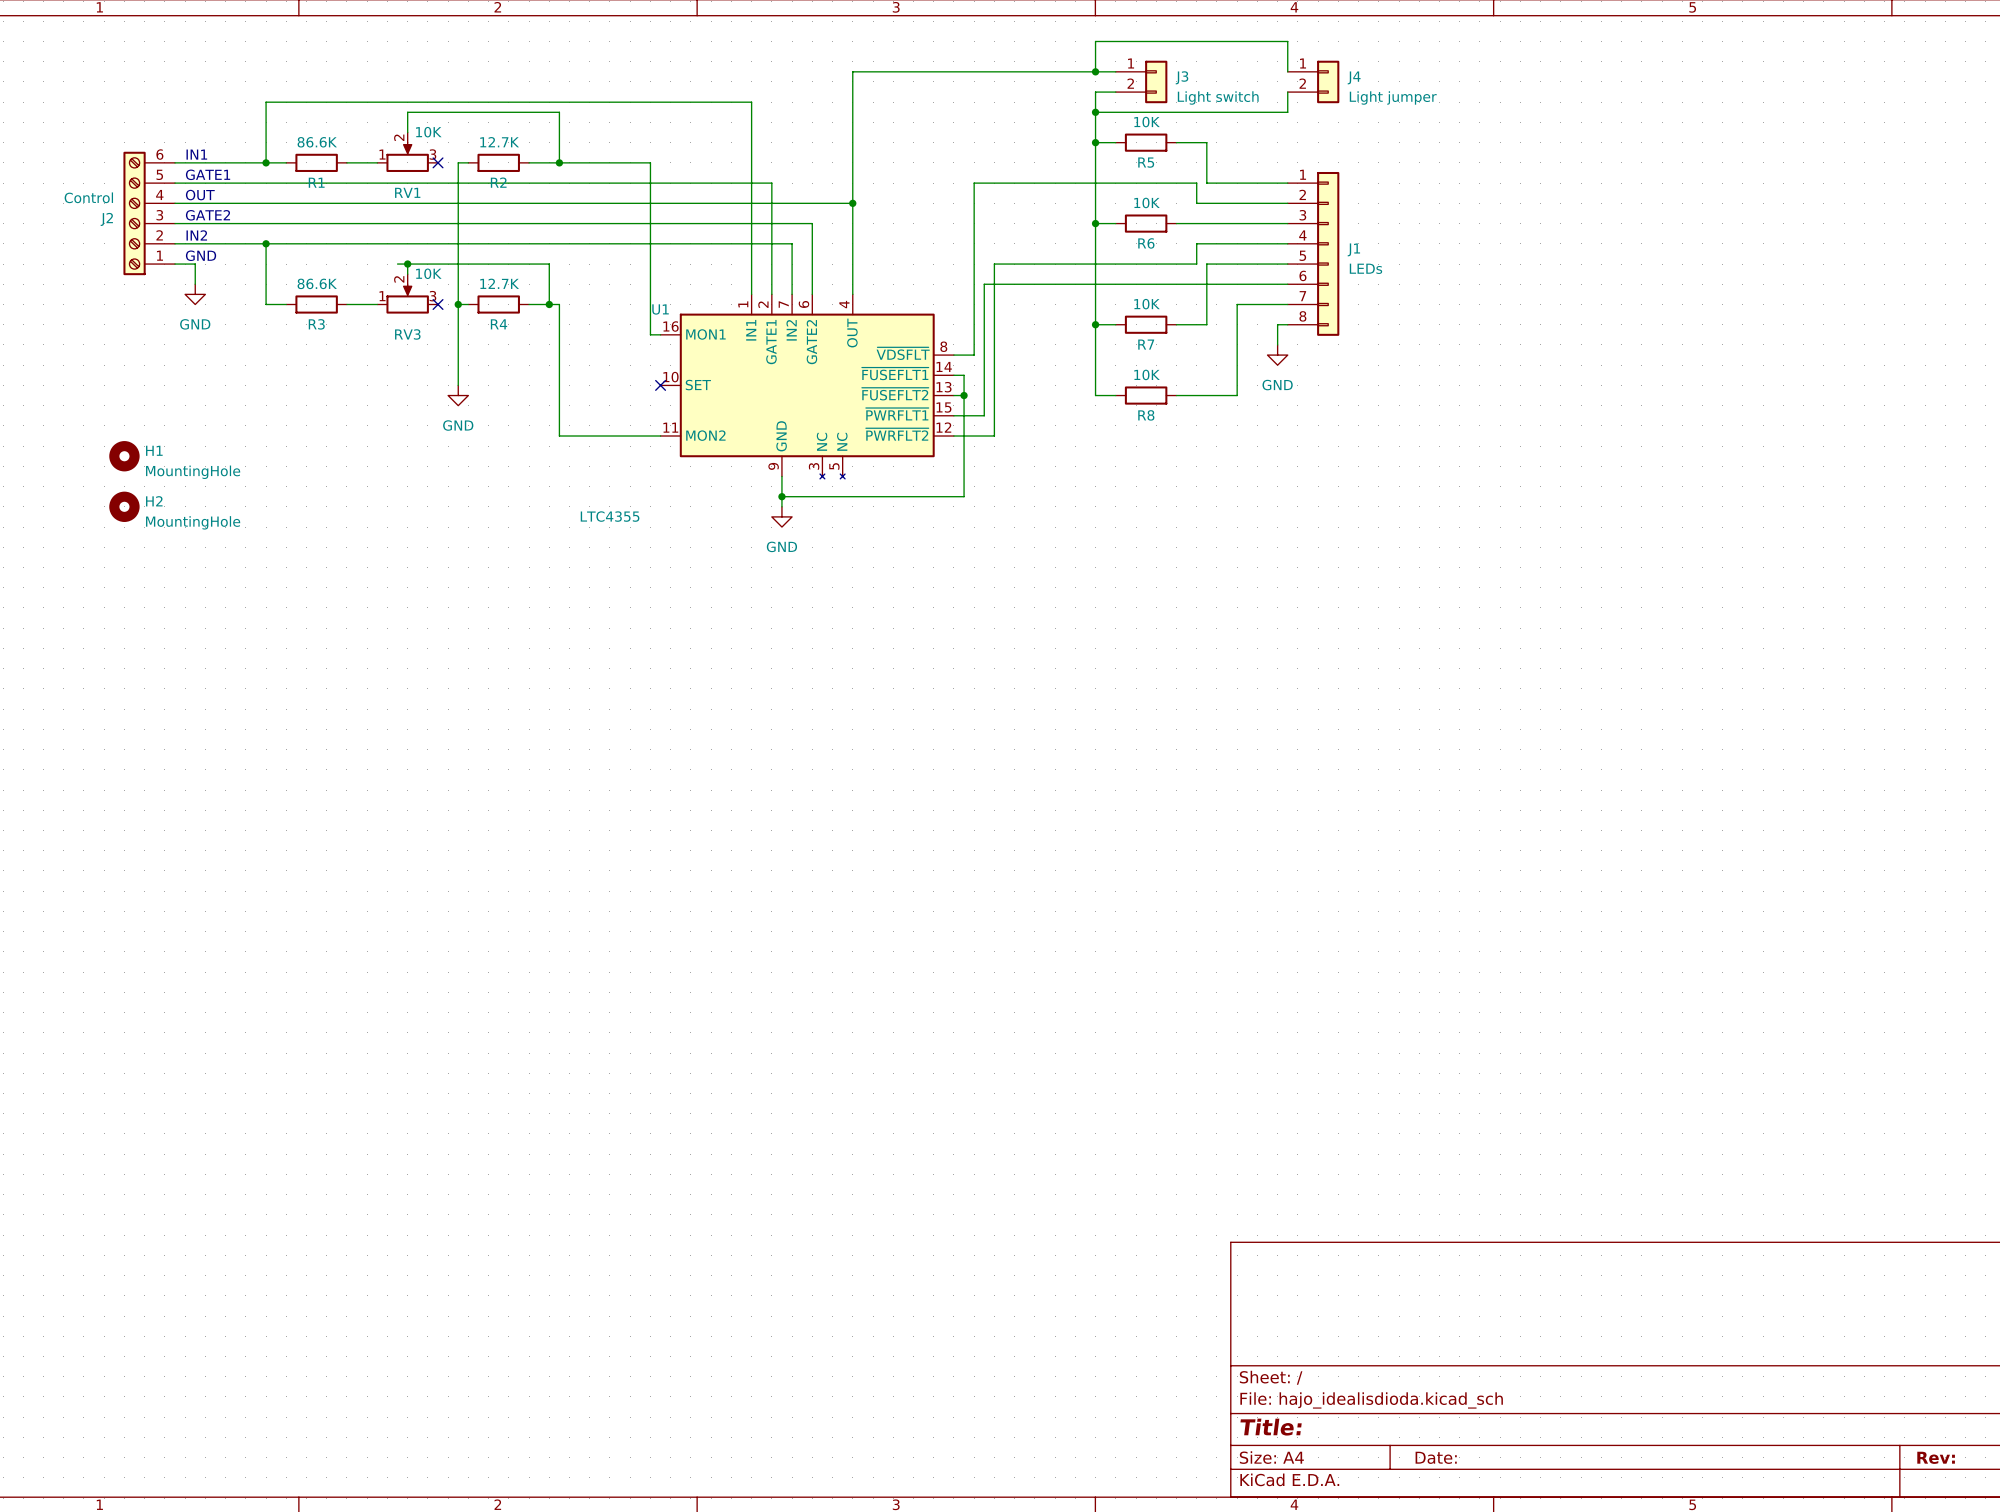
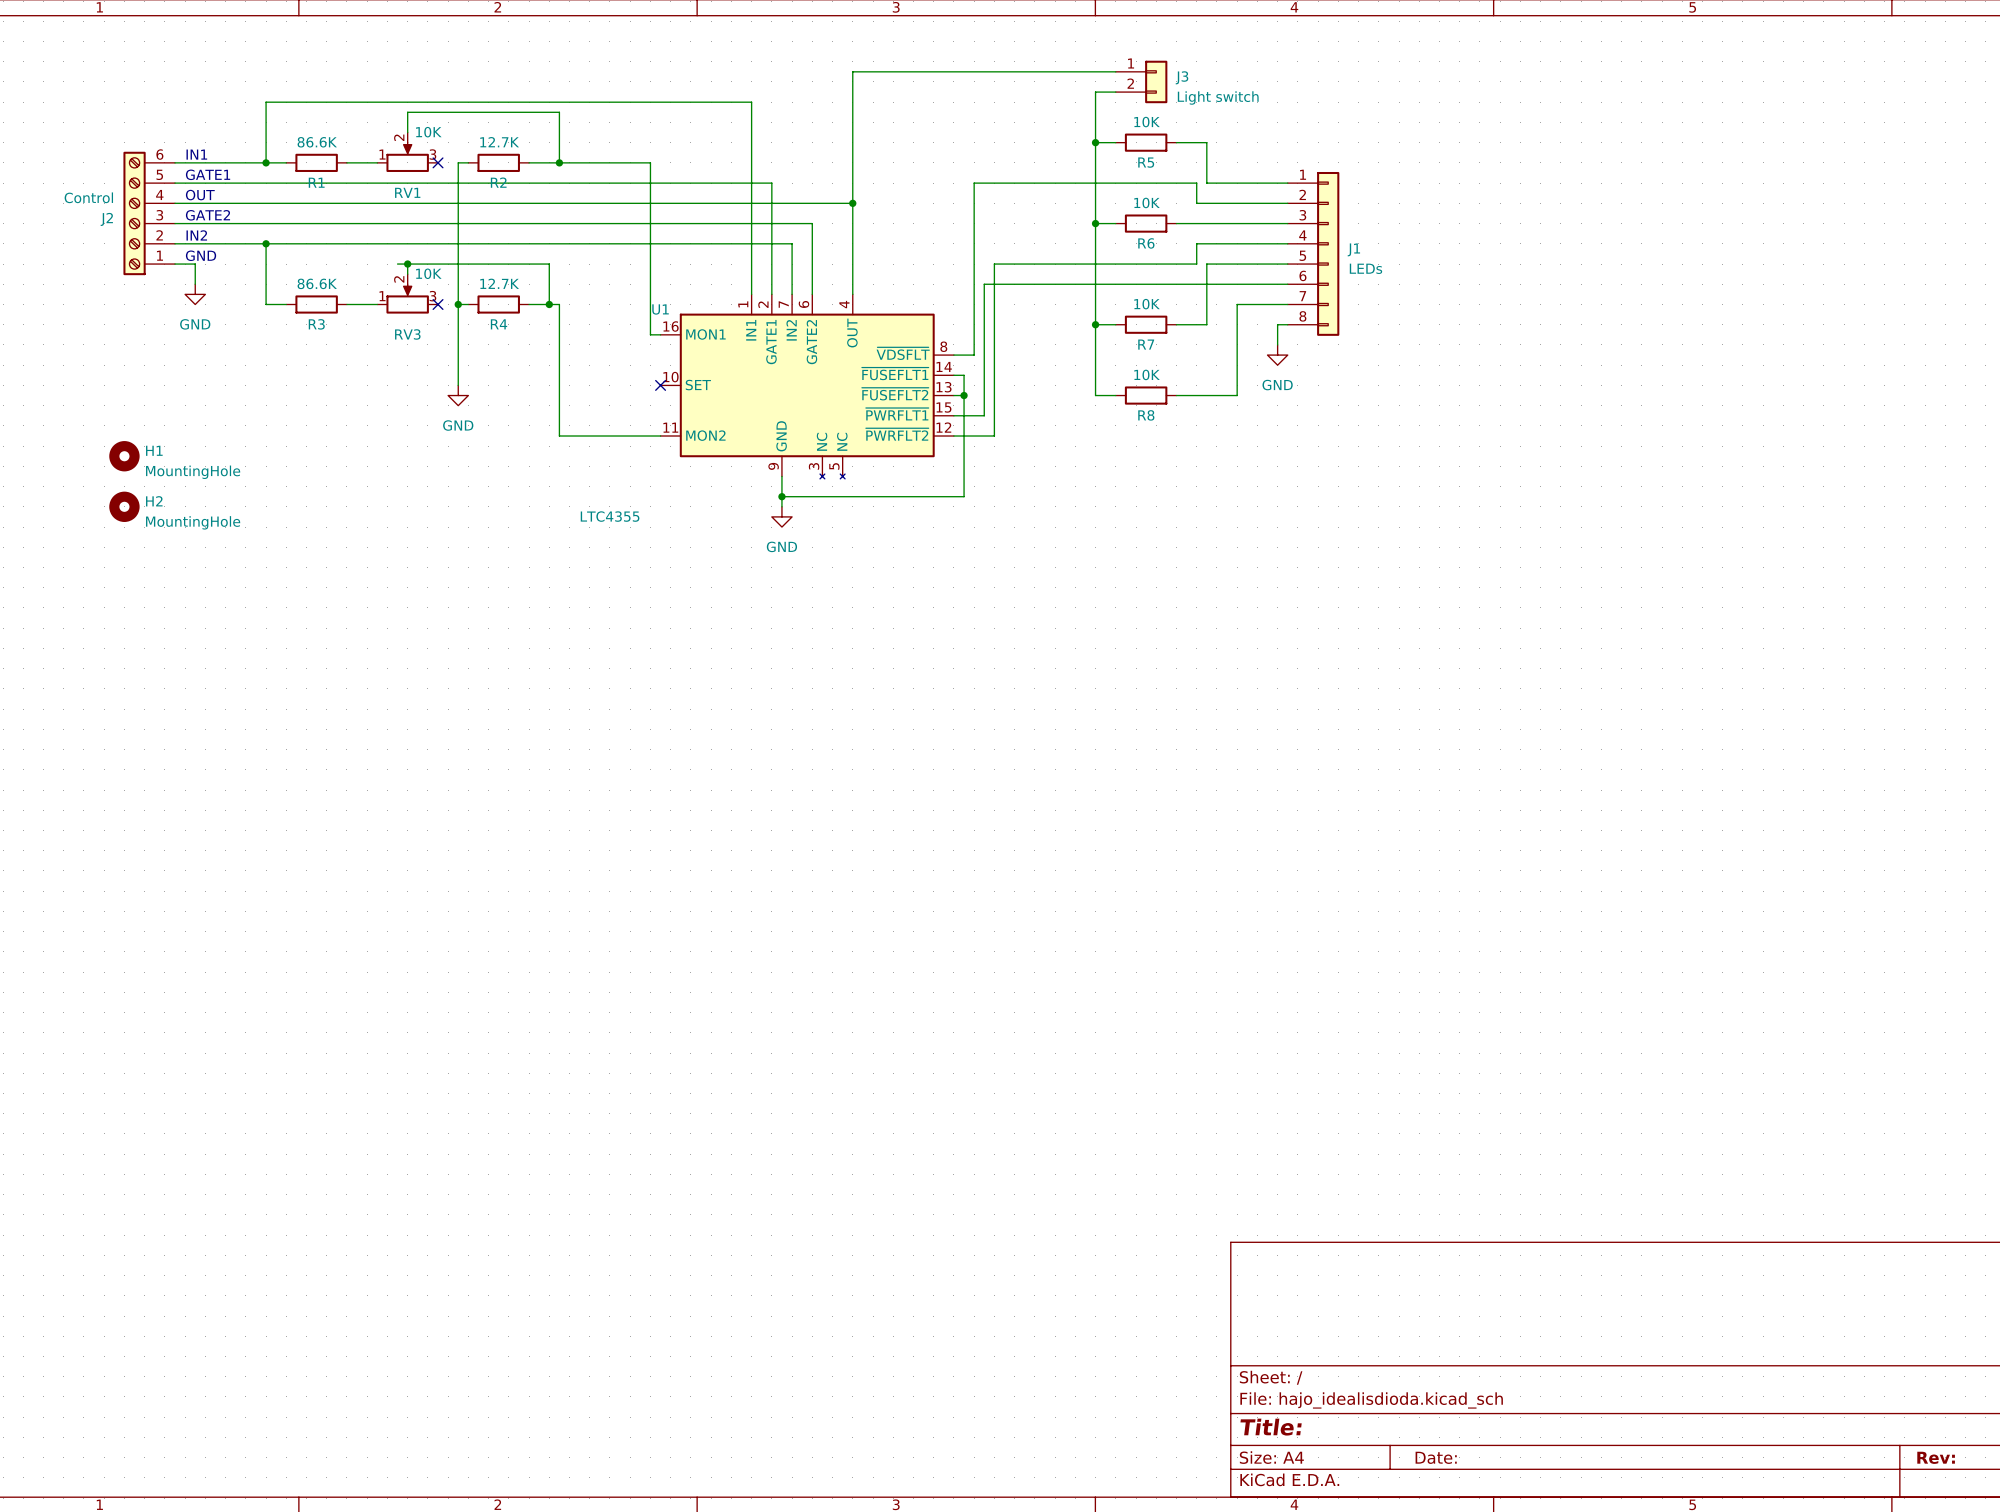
wire: (1095, 71) (1095, 41) (1287, 41) (1287, 71) -> none
junction: (1095, 71) -> none
J4: Light jumper (1313, 81) -> none
wire: (1287, 92) (1287, 112) (1095, 112) -> none
junction: (1095, 112) -> none

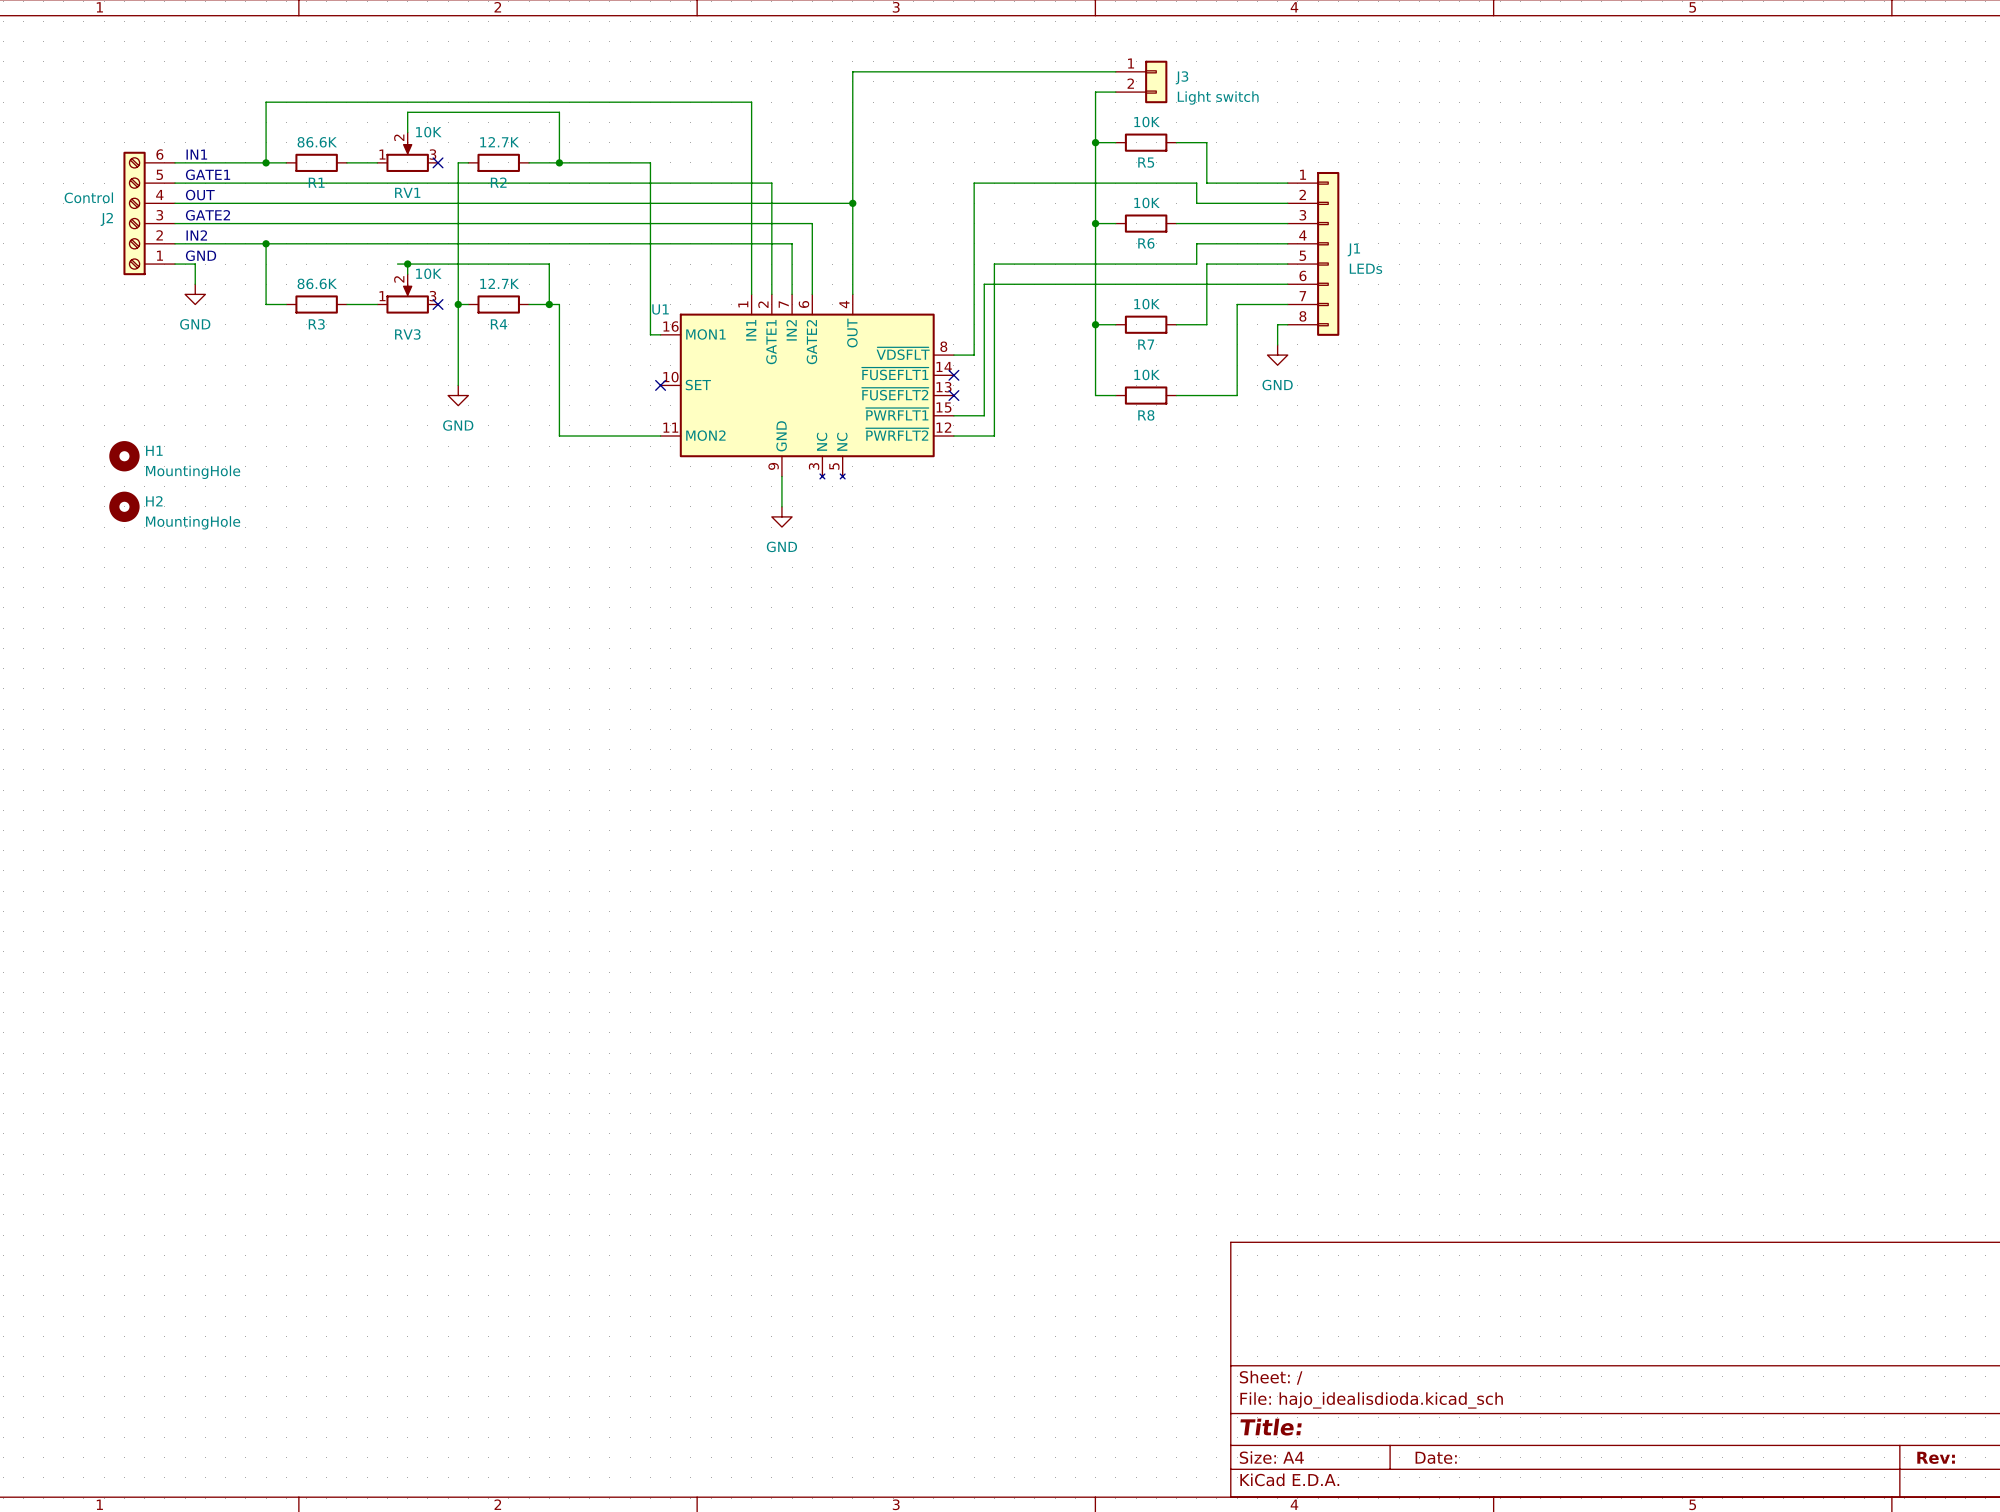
wire: (953, 375) (964, 375) (964, 496) (781, 496) -> none
no-connect mark: none -> (953, 375)
wire: (953, 395) (964, 395) -> none
no-connect mark: none -> (953, 395)
junction: (964, 395) -> none
junction: (781, 496) -> none
U1 value: LTC4355 (610, 516) -> none

